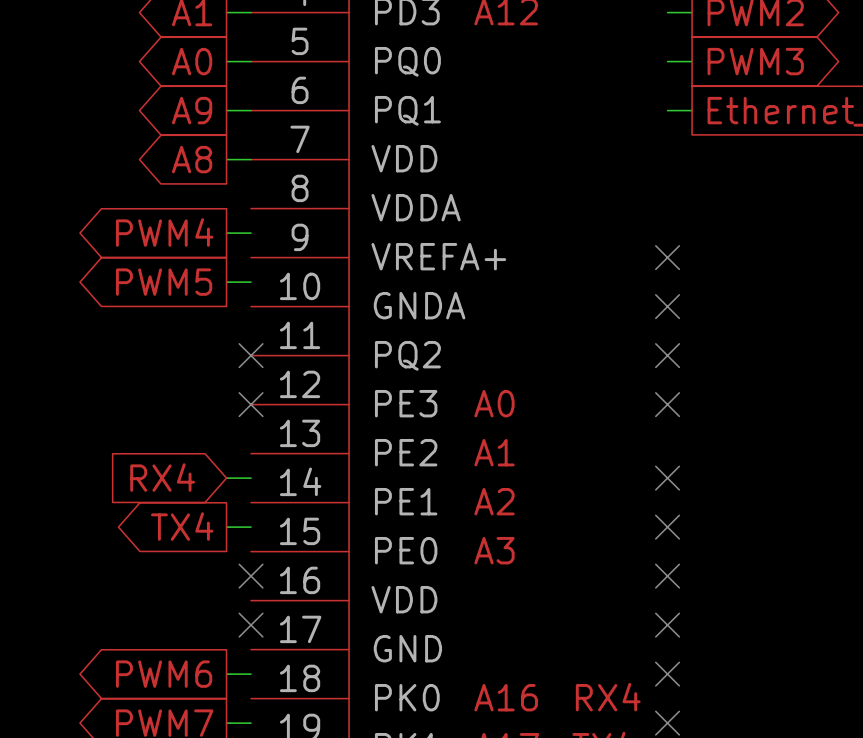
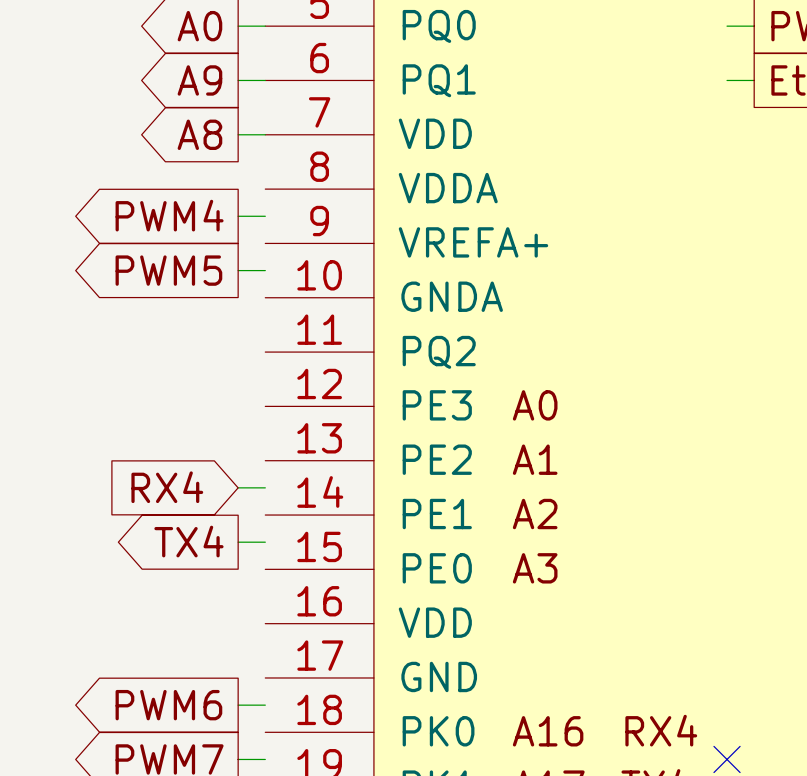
no-connect mark: (667, 257) -> none
no-connect mark: (667, 306) -> none
no-connect mark: (251, 355) -> none
no-connect mark: (667, 355) -> none
no-connect mark: (251, 404) -> none
no-connect mark: (667, 404) -> none
no-connect mark: (667, 478) -> none
no-connect mark: (667, 527) -> none
no-connect mark: (251, 576) -> none
no-connect mark: (667, 576) -> none
no-connect mark: (251, 625) -> none
no-connect mark: (667, 625) -> none
no-connect mark: (667, 674) -> none

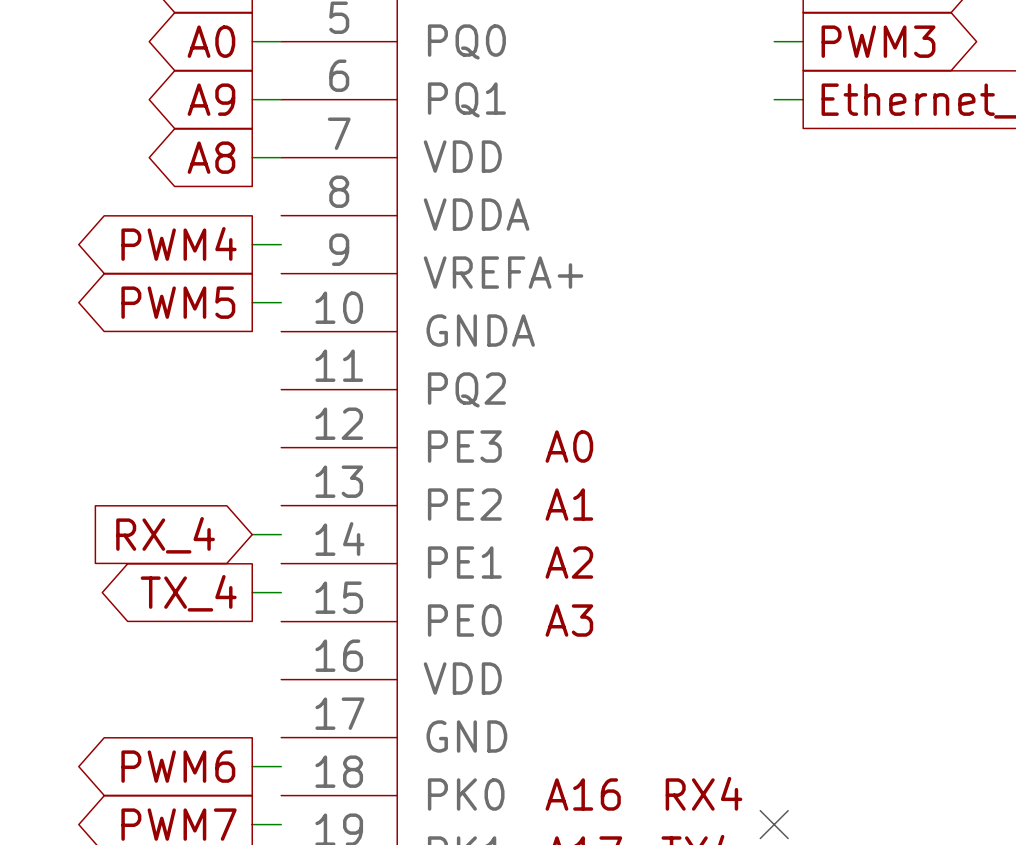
global label: RX4 (167, 487) -> RX_4 (165, 535)
global label: TX4 (188, 541) -> TX_4 (188, 593)

